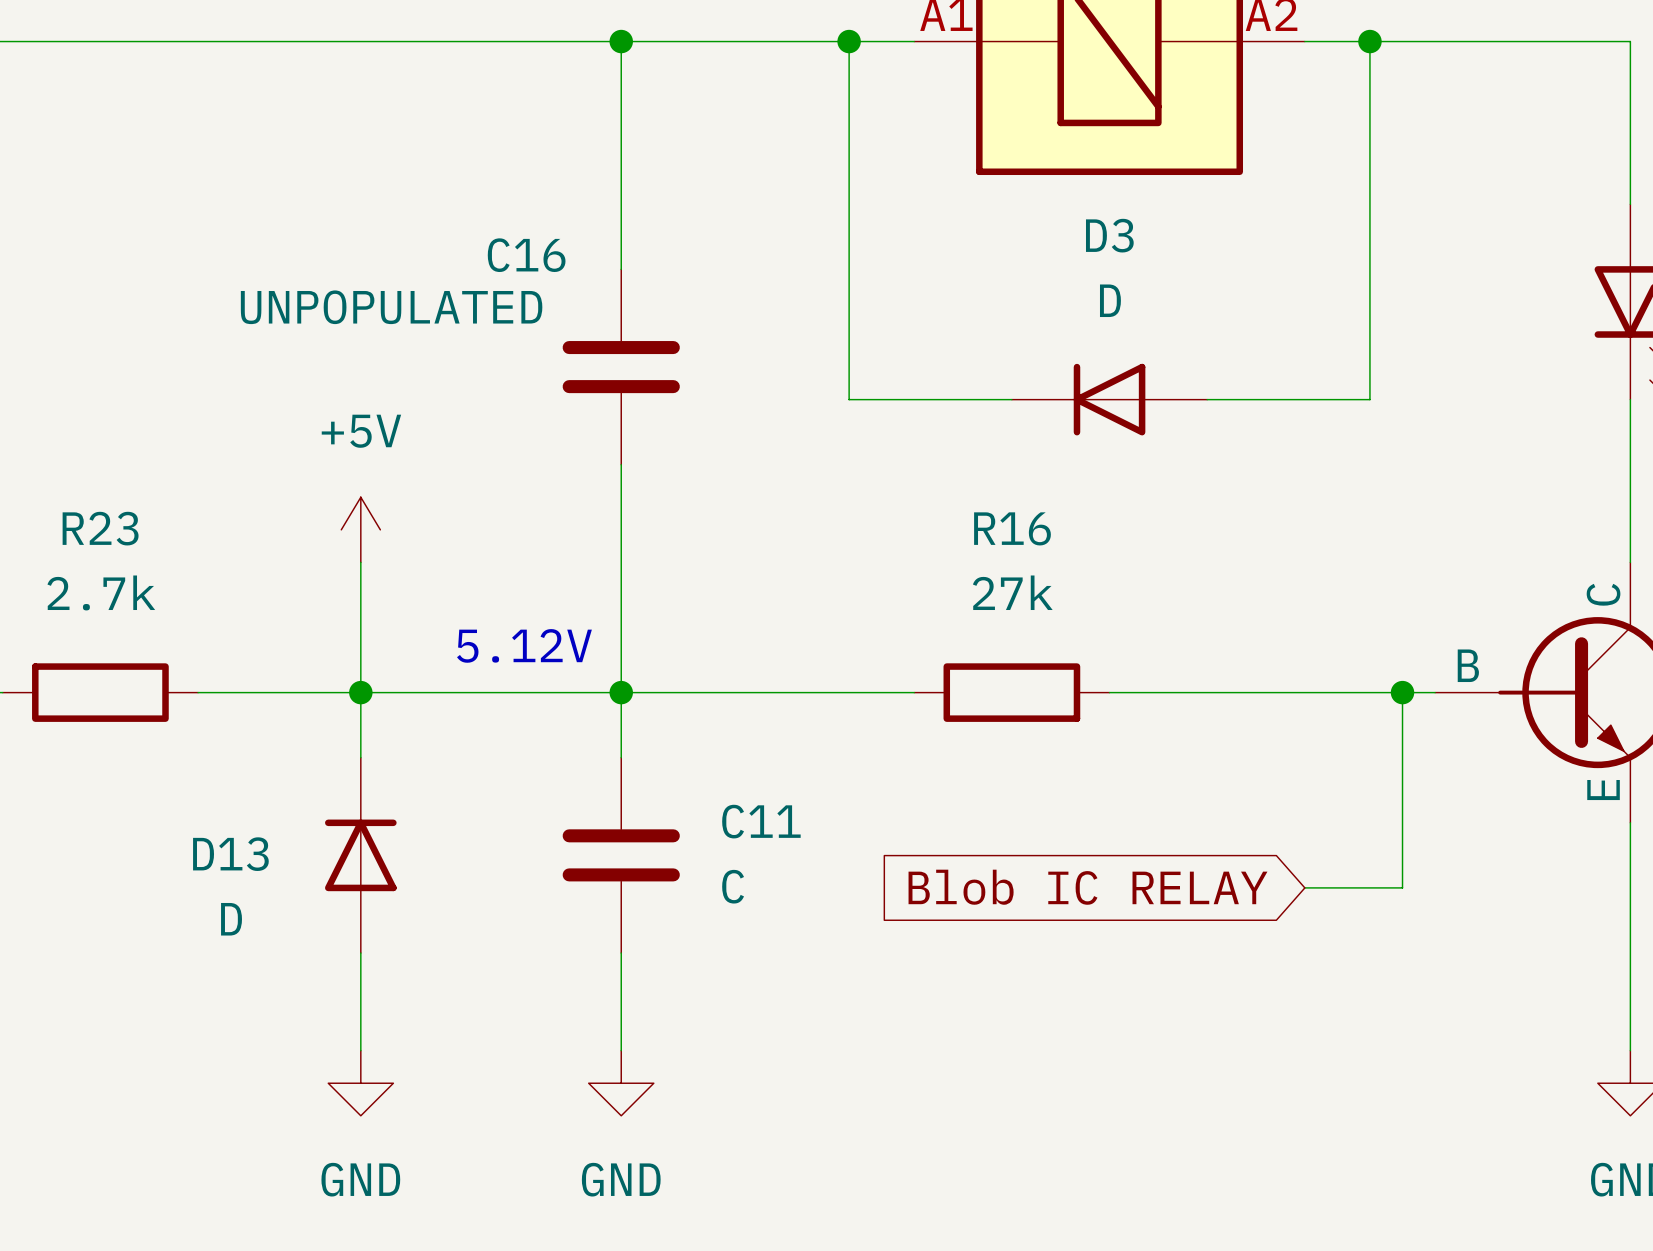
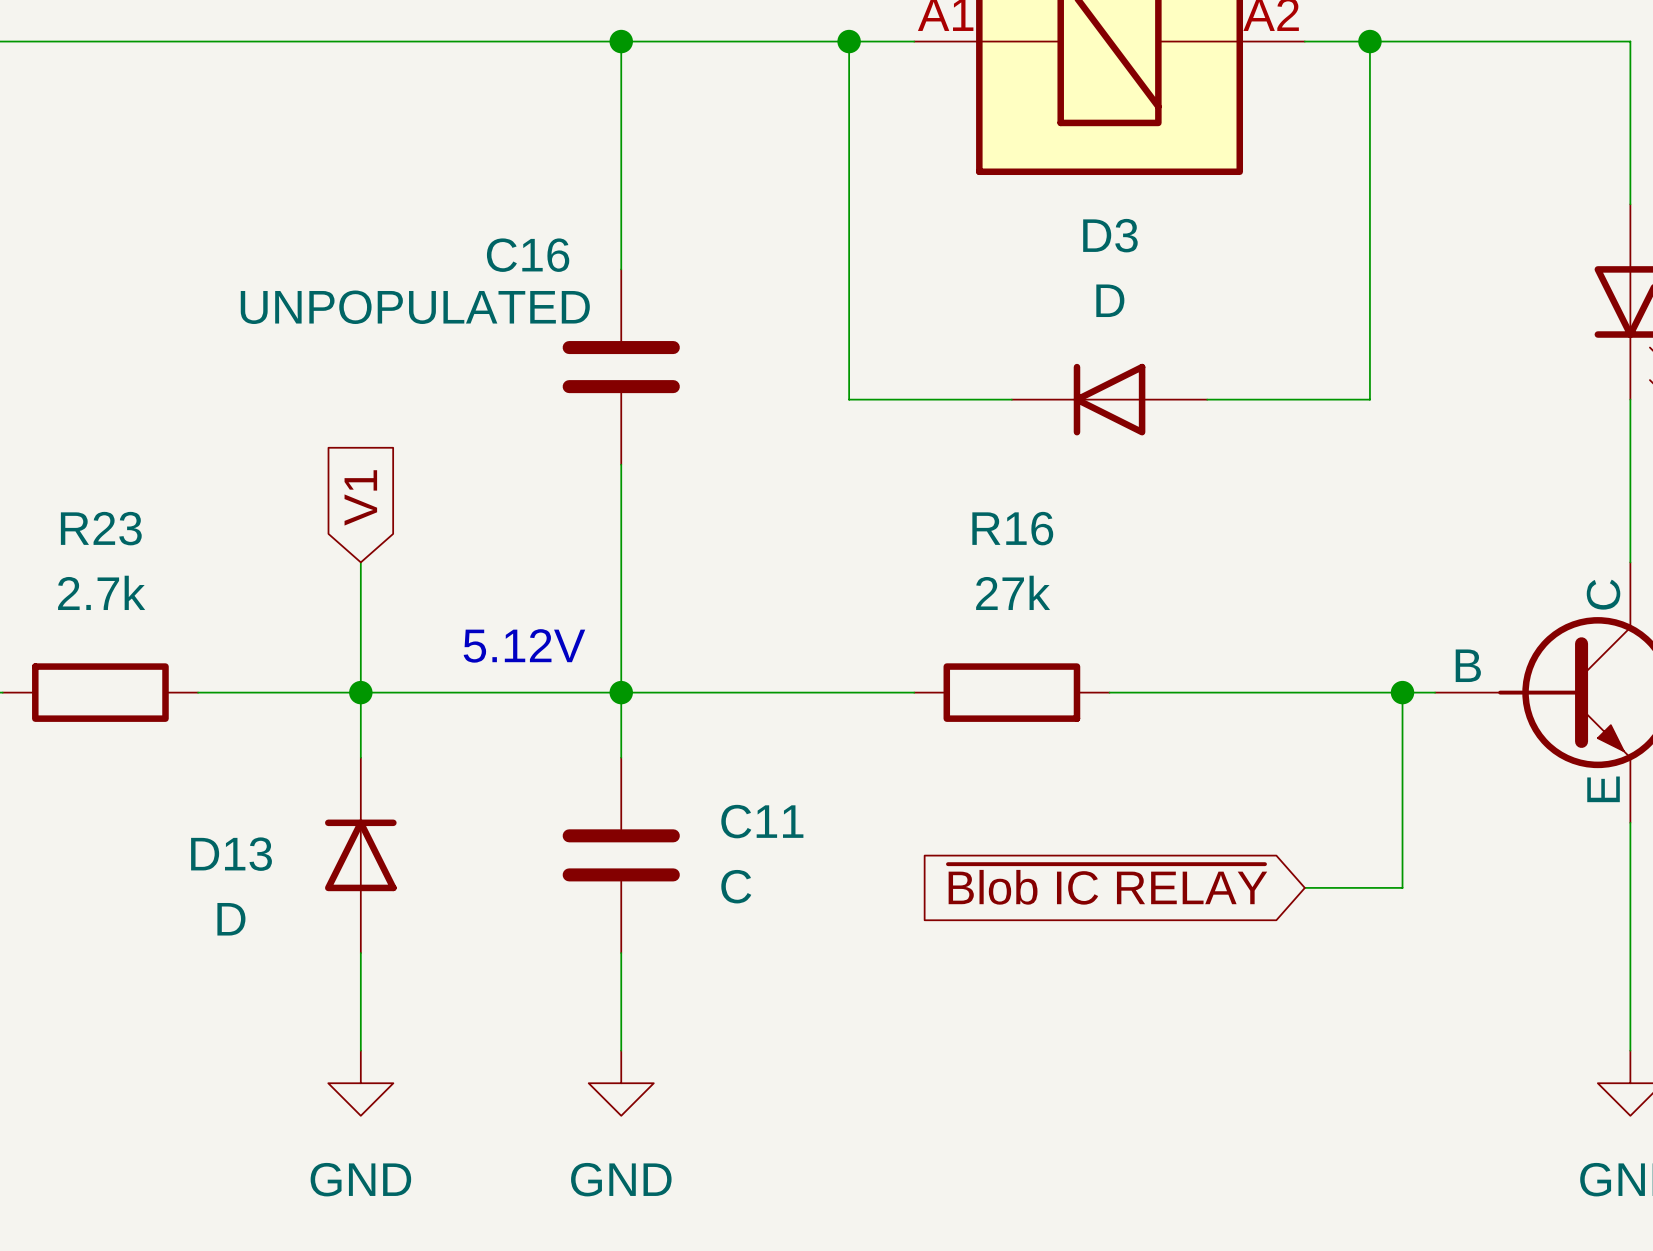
global label: none -> V1 (360, 497)
power symbol: +5V (360, 529) -> none
global label: Blob IC RELAY (1087, 887) -> ~{Blob IC RELAY} (1107, 884)

